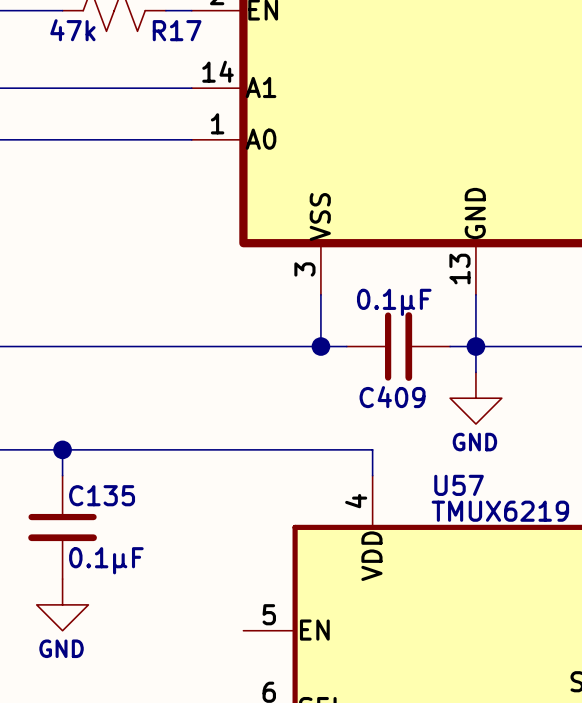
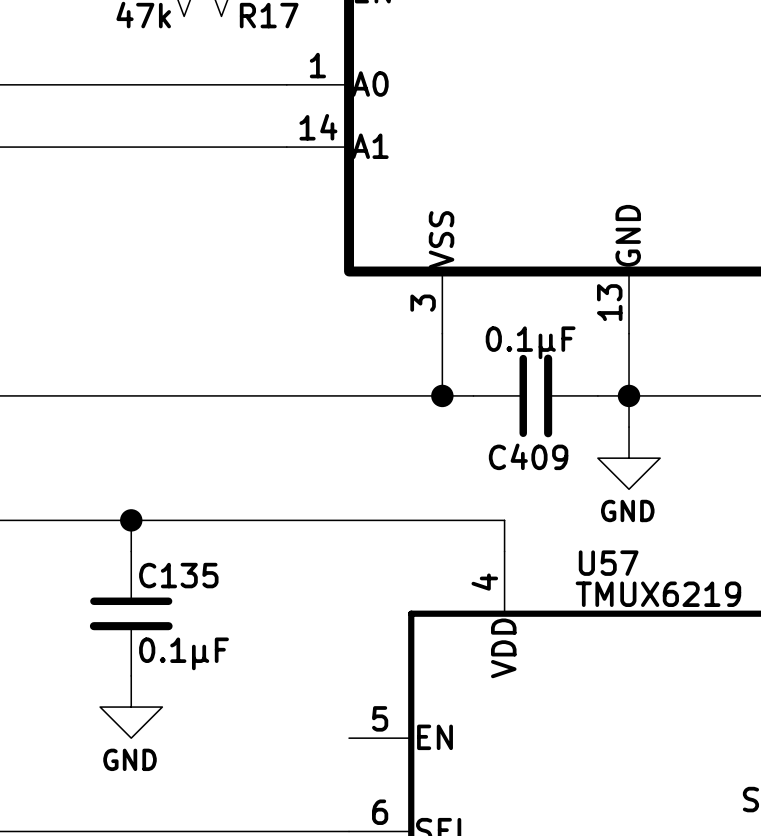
part pin number: 14 (218, 71) -> 1 (317, 65)
part pin name: A1 (261, 87) -> A0 (370, 84)
part pin number: 1 (217, 123) -> 14 (318, 127)
part pin name: A0 (261, 139) -> A1 (370, 146)

